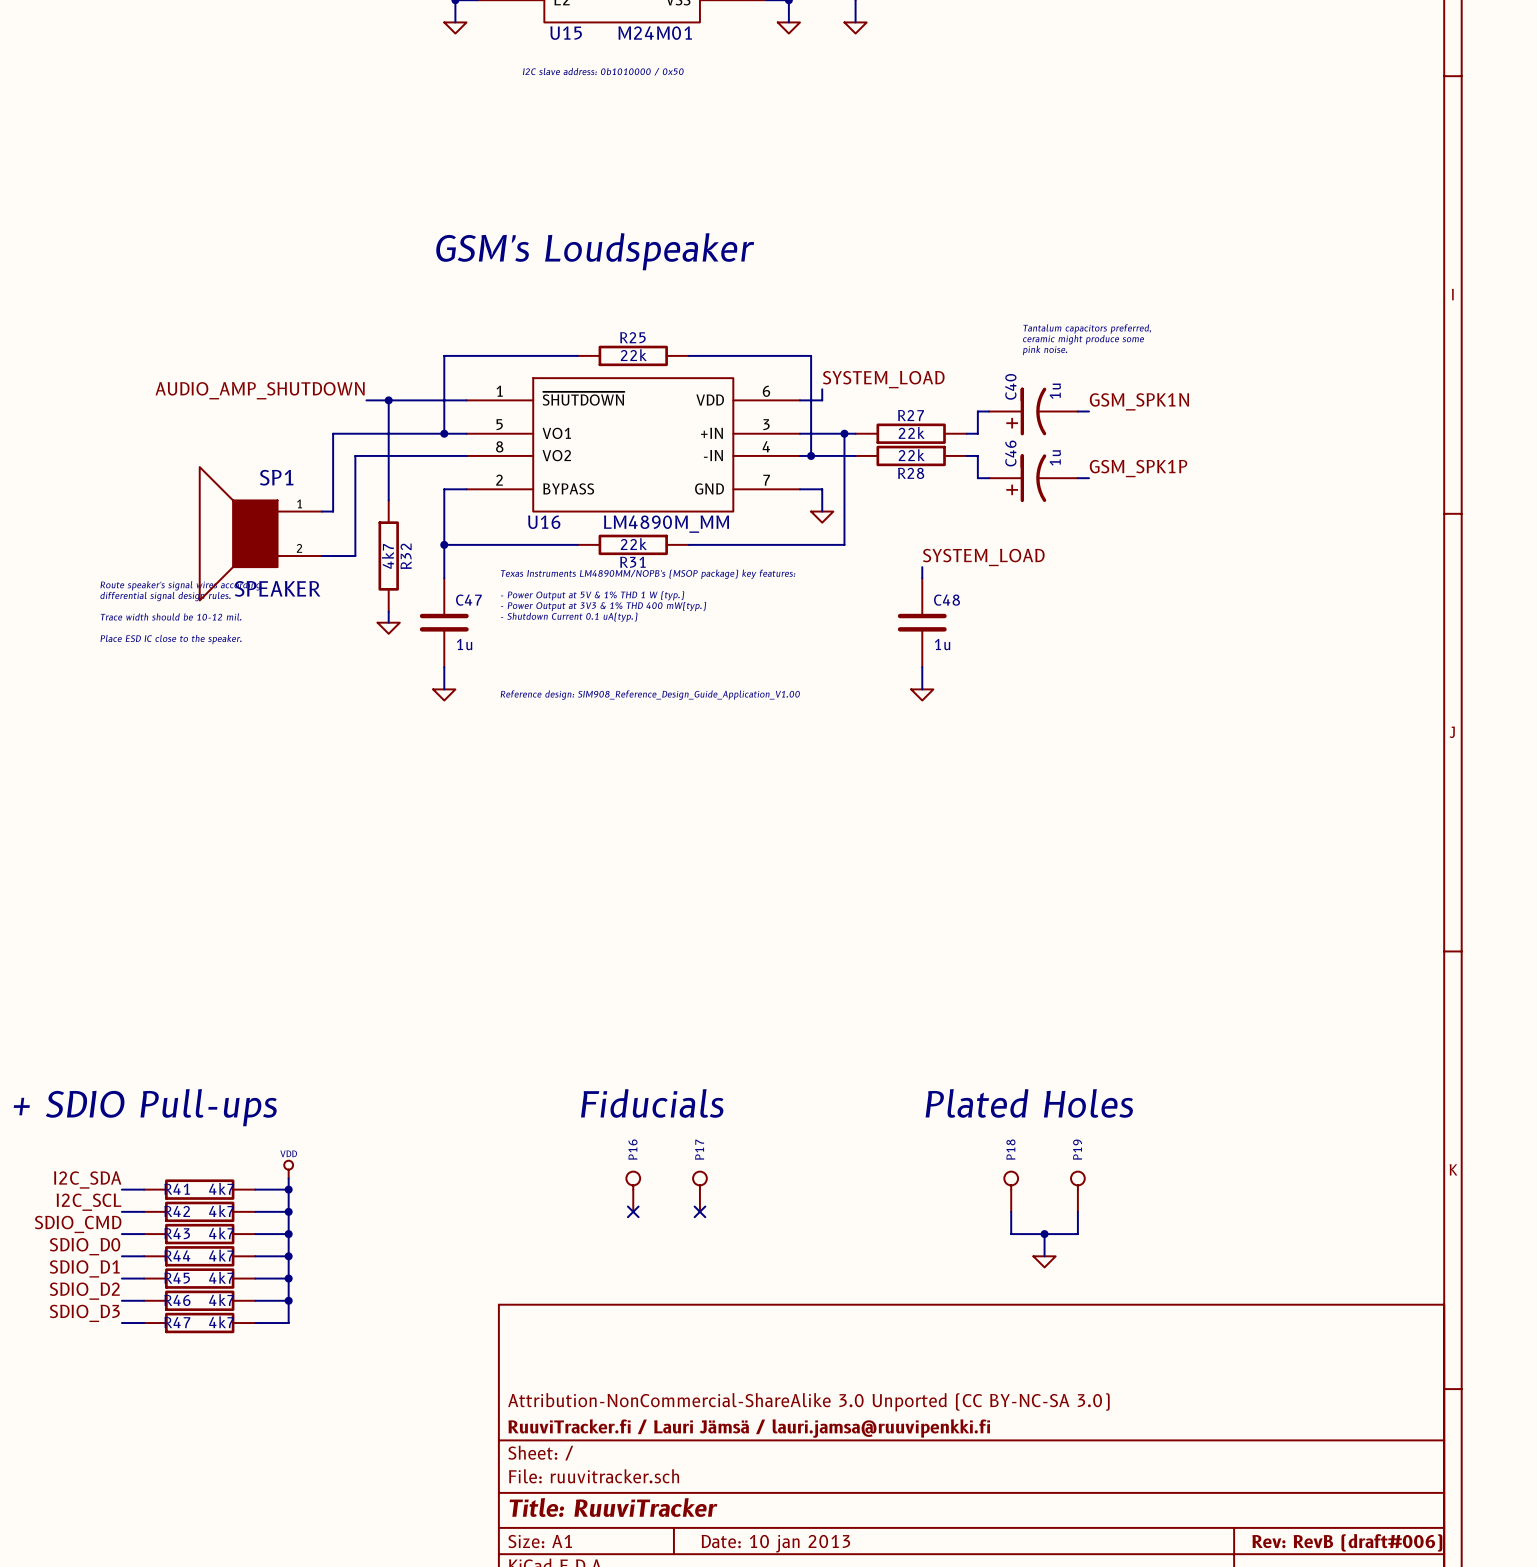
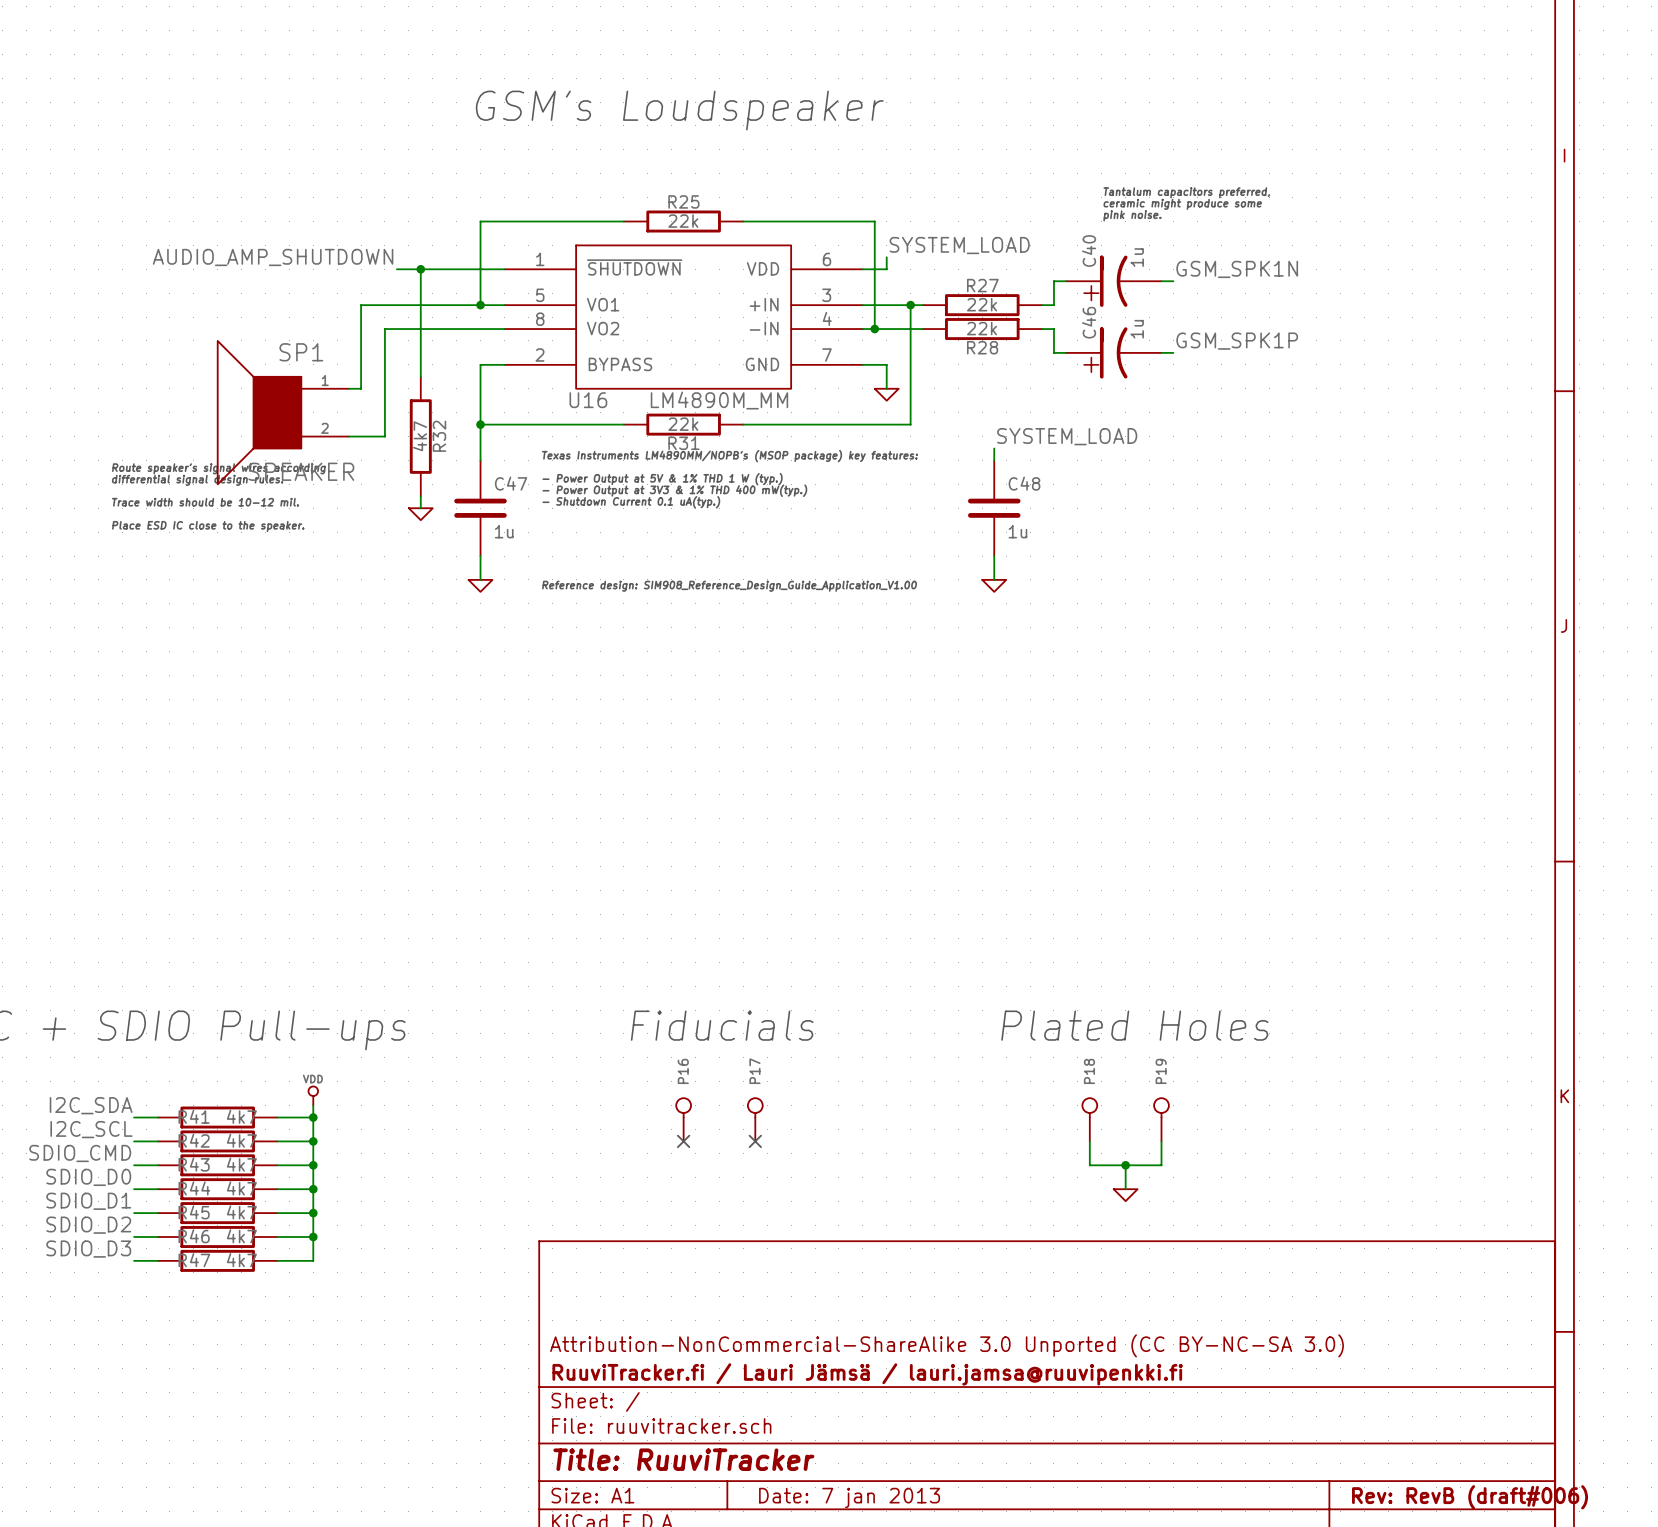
title block: Date: 10 jan 2013 (775, 1543) -> Date: 7 jan 2013 (849, 1497)

